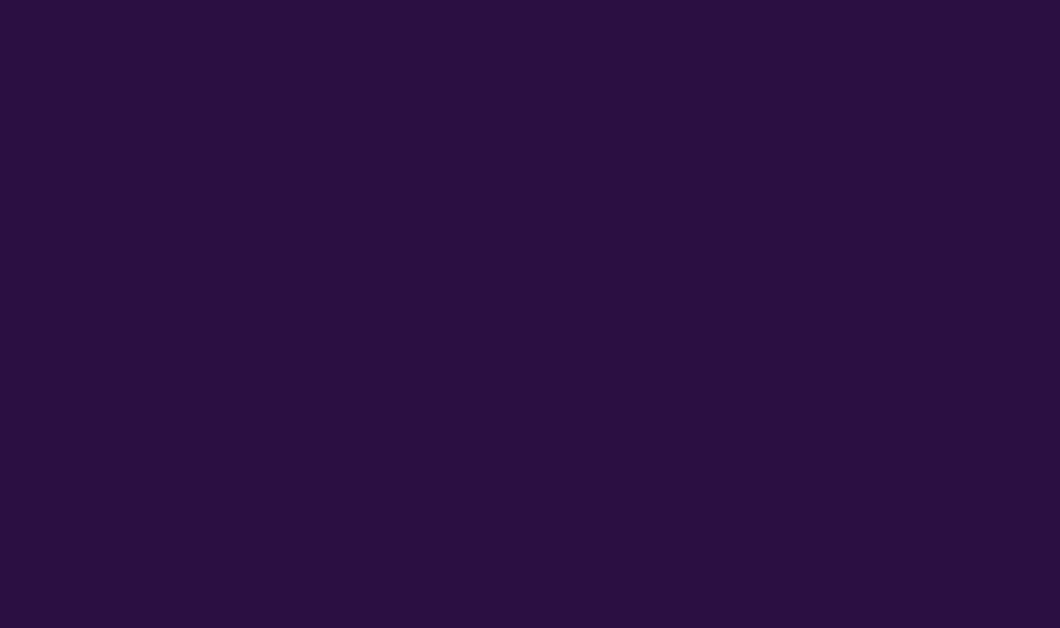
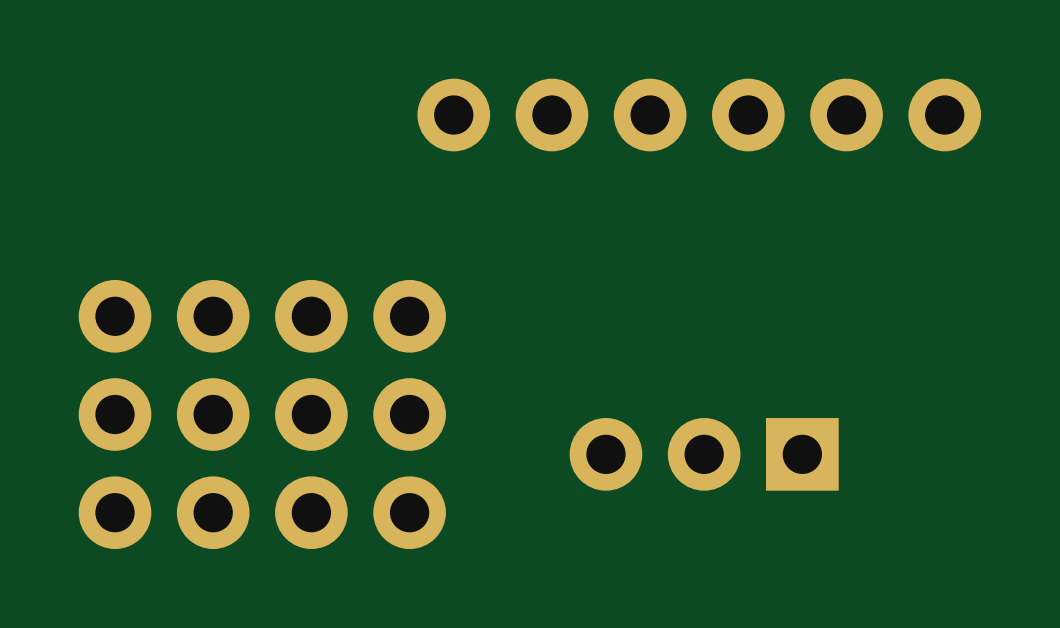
part: none -> (699, 115)
part: none -> (262, 414)
part: none -> (704, 454)

